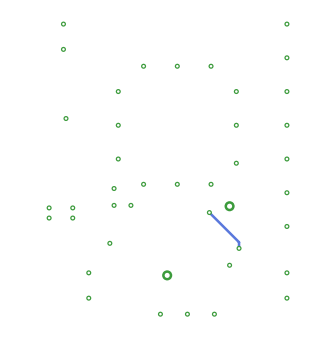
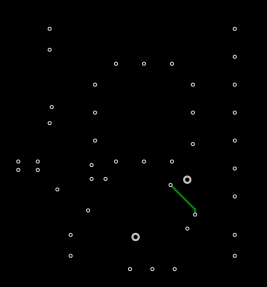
via: none -> (49, 123)
via: none -> (18, 161)
via: none -> (37, 161)
via: none -> (18, 169)
via: none -> (37, 169)
via: (49, 207) -> none
via: (72, 207) -> none
via: (49, 218) -> none

